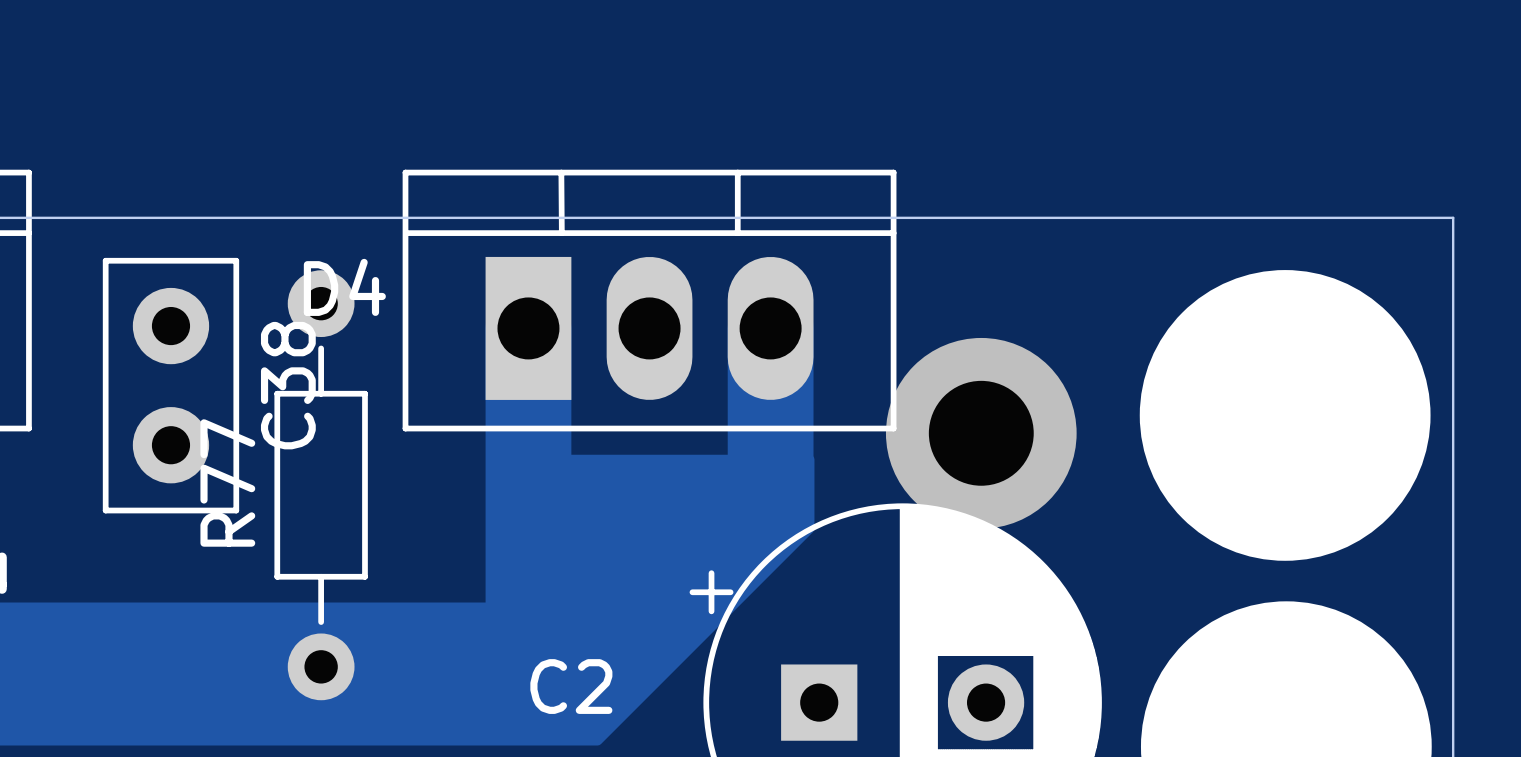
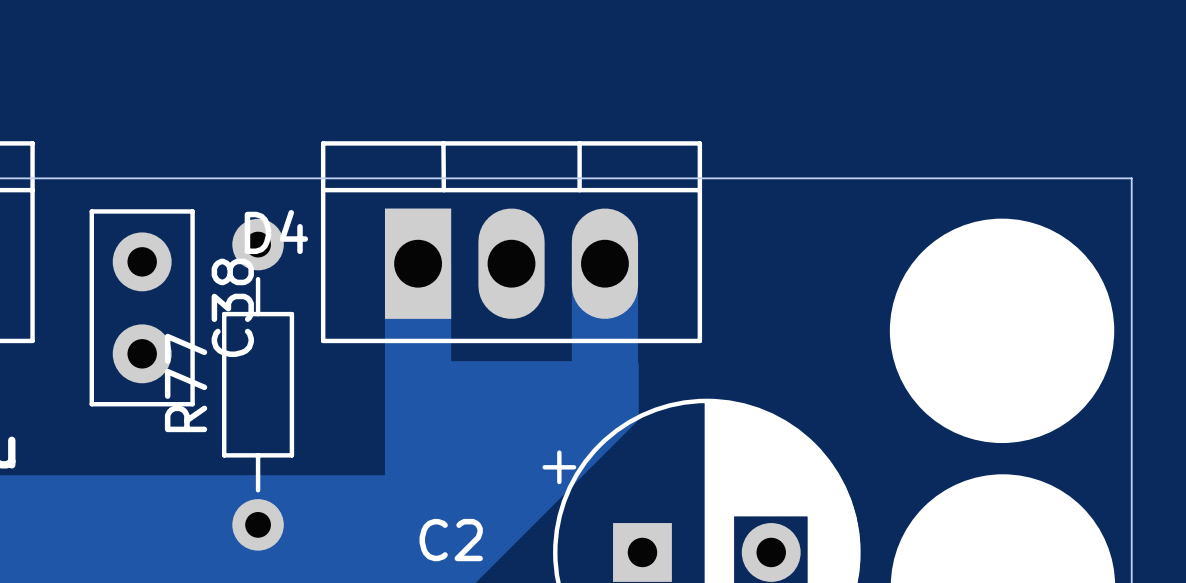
via: (981, 433) -> none

